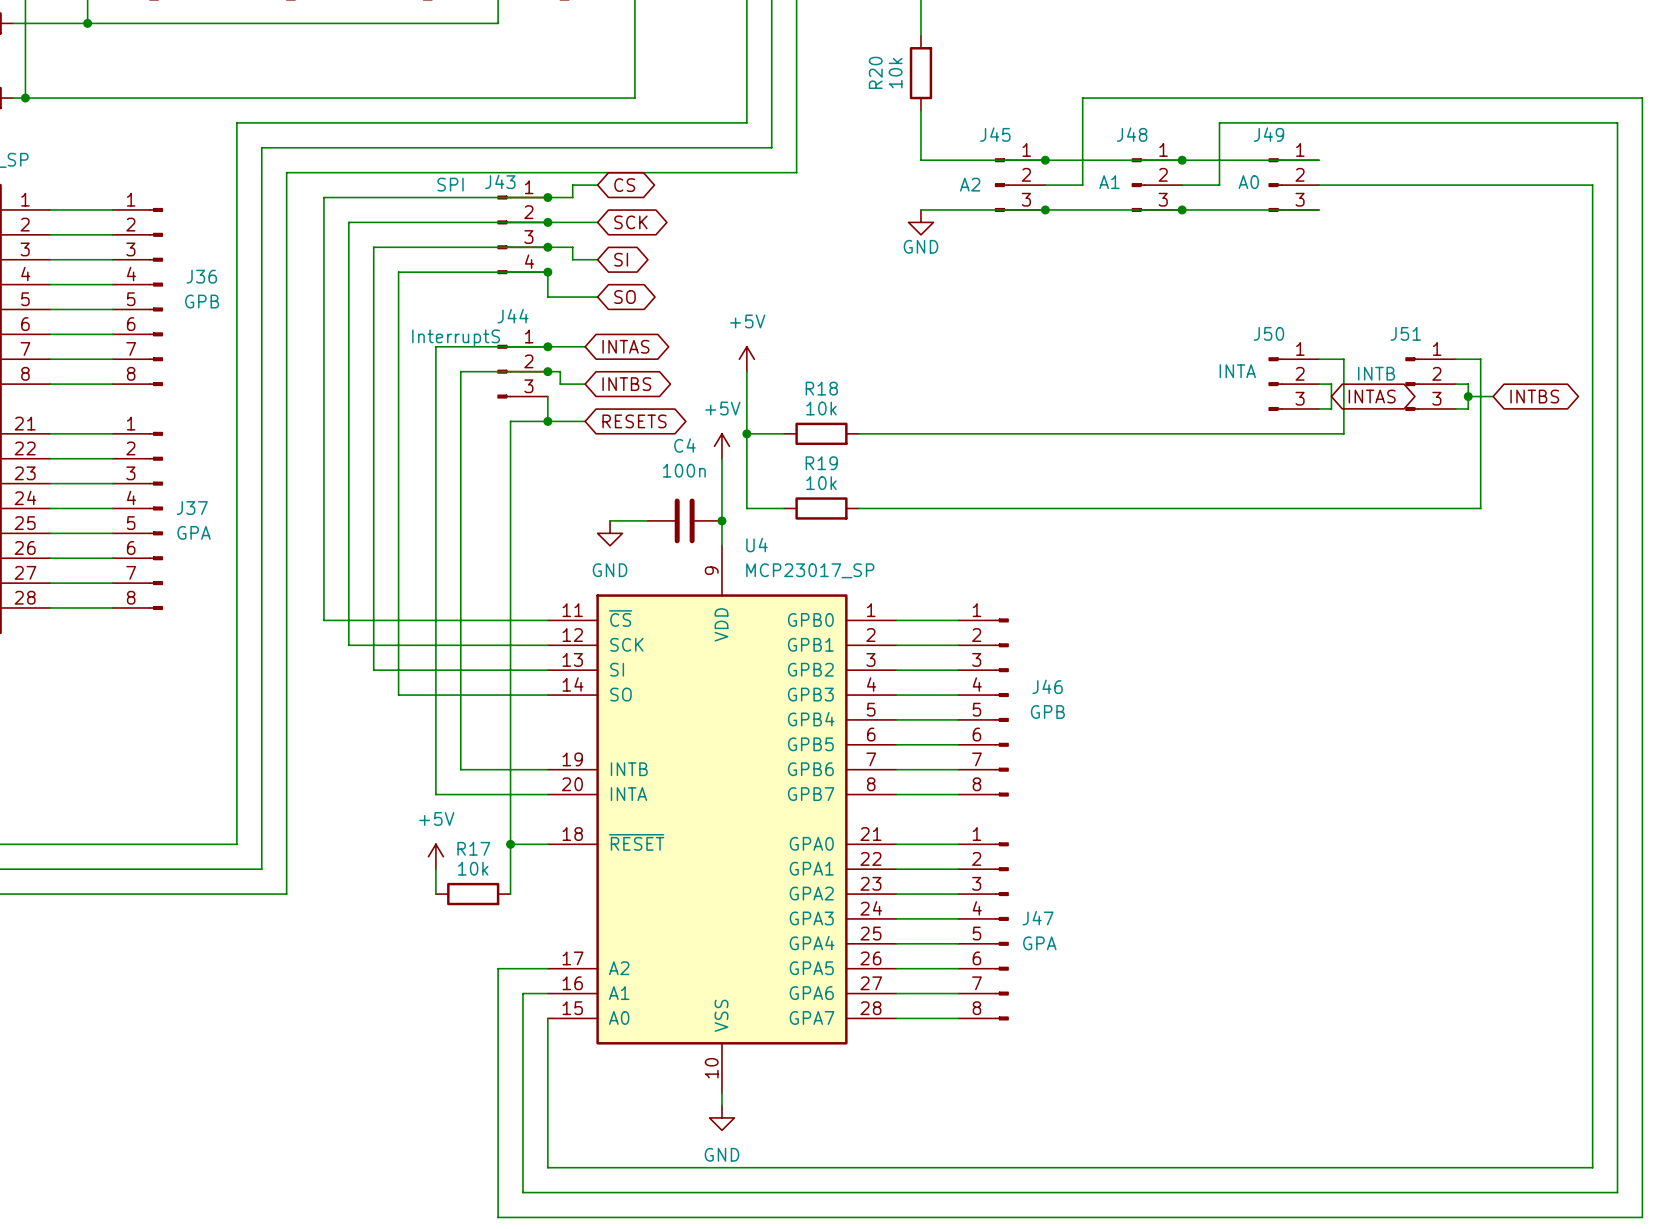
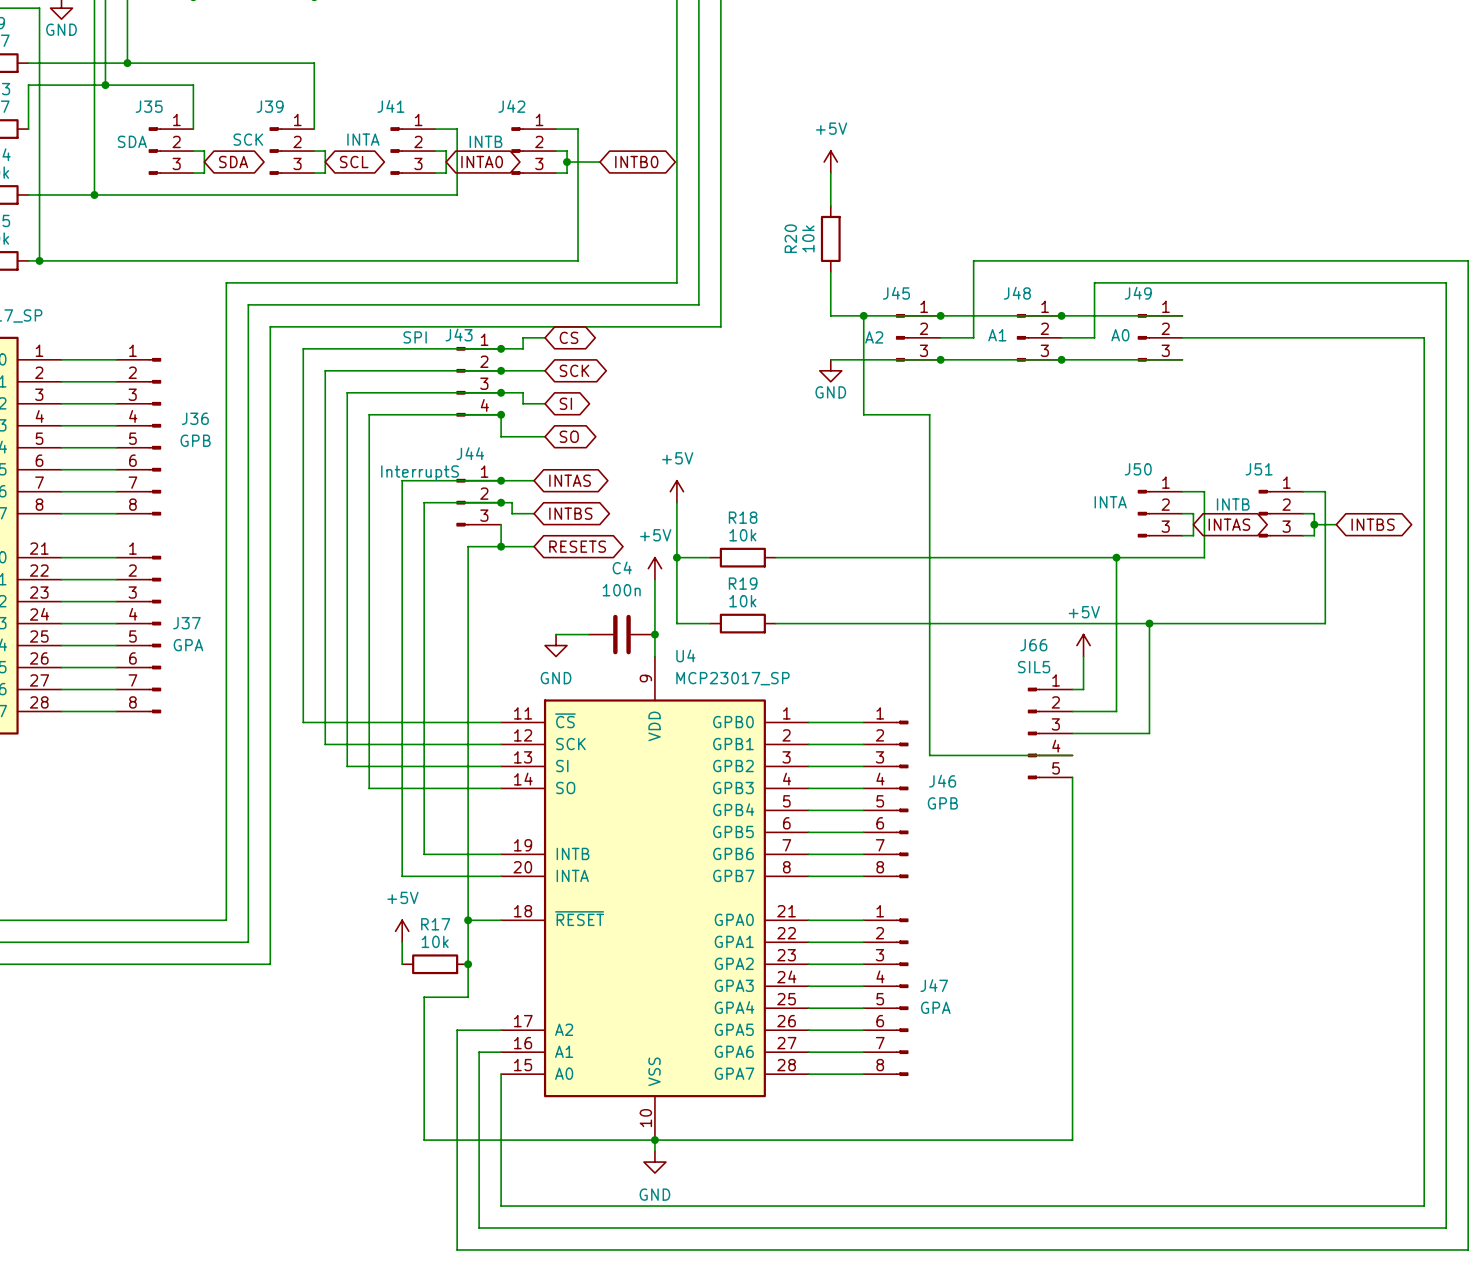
wire: none -> (863, 315) (863, 414) (929, 414) (929, 755) (1072, 755)
junction: none -> (863, 315)
wire: none -> (1116, 557) (1116, 711) (1072, 711)
junction: none -> (1116, 557)
wire: none -> (1149, 623) (1149, 733) (1072, 733)
junction: none -> (1149, 623)
power symbol: none -> +5V (1083, 645)
wire: none -> (1083, 656) (1083, 689) (1072, 689)
J66: none -> SIL5 (1050, 733)
wire: none -> (1072, 777) (1072, 1140) (424, 1140) (424, 997) (468, 997) (468, 964)
junction: none -> (468, 964)
junction: none -> (654, 1140)

